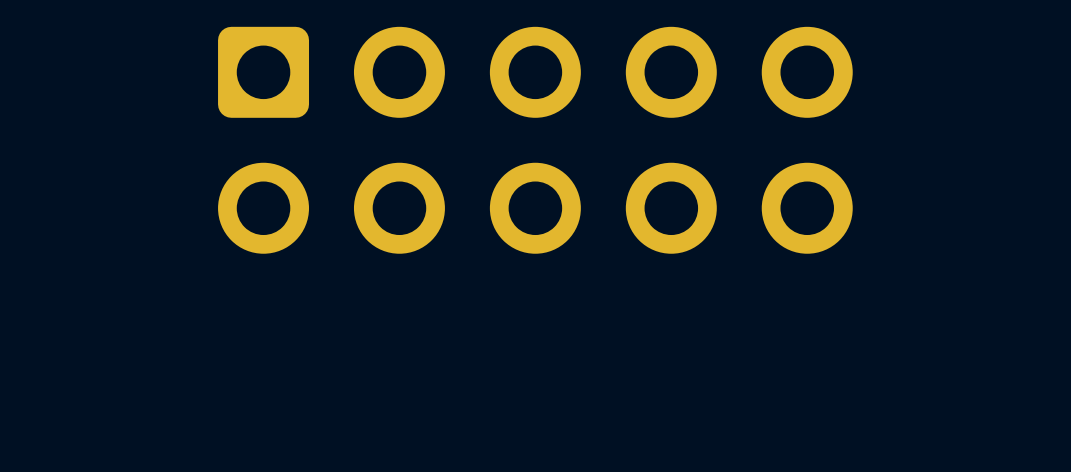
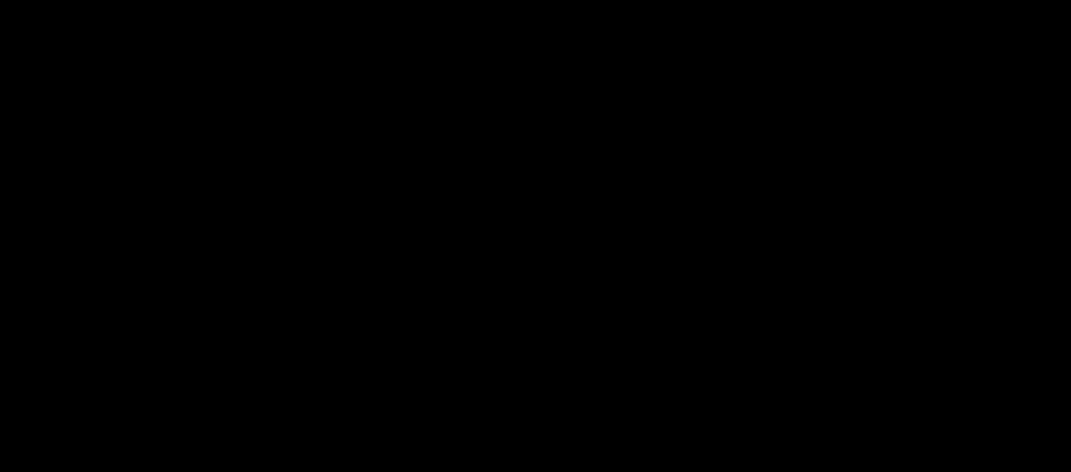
part: (535, 140) -> none

